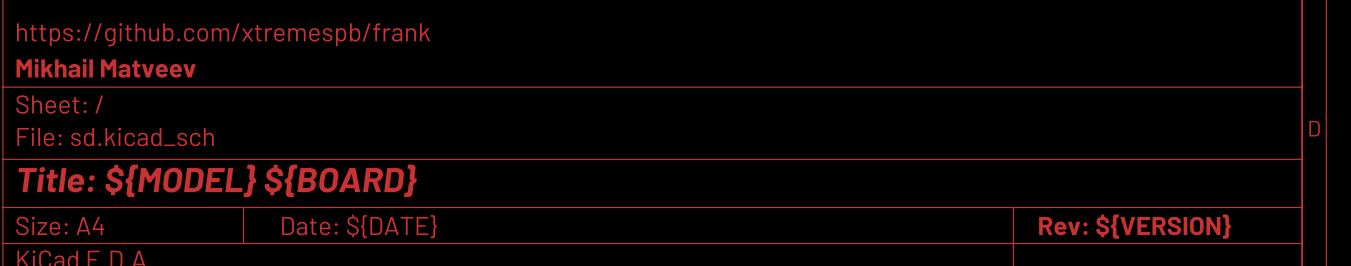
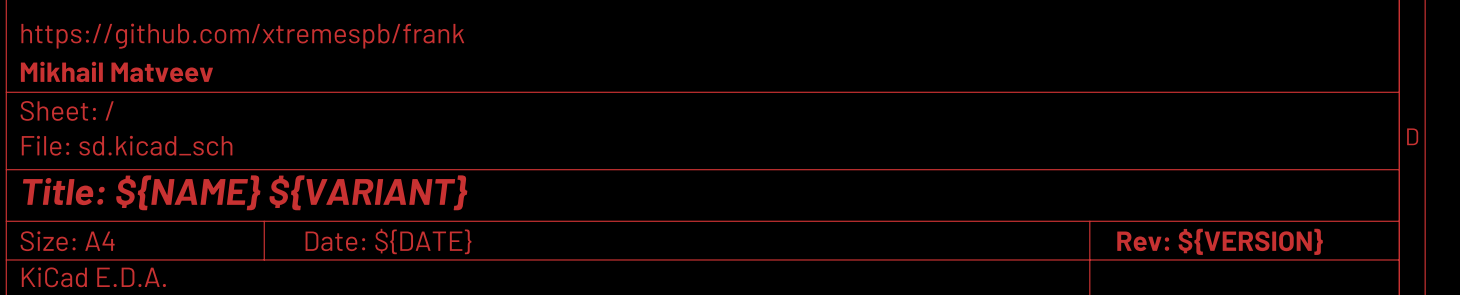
title block: Title: ${MODEL} ${BOARD} (217, 180) -> Title: ${NAME} ${VARIANT} (245, 192)

